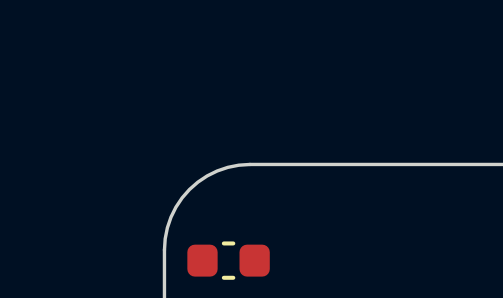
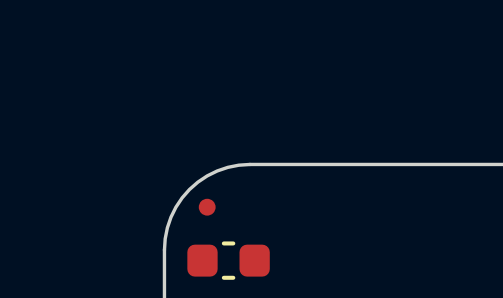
part: none -> (207, 207)

